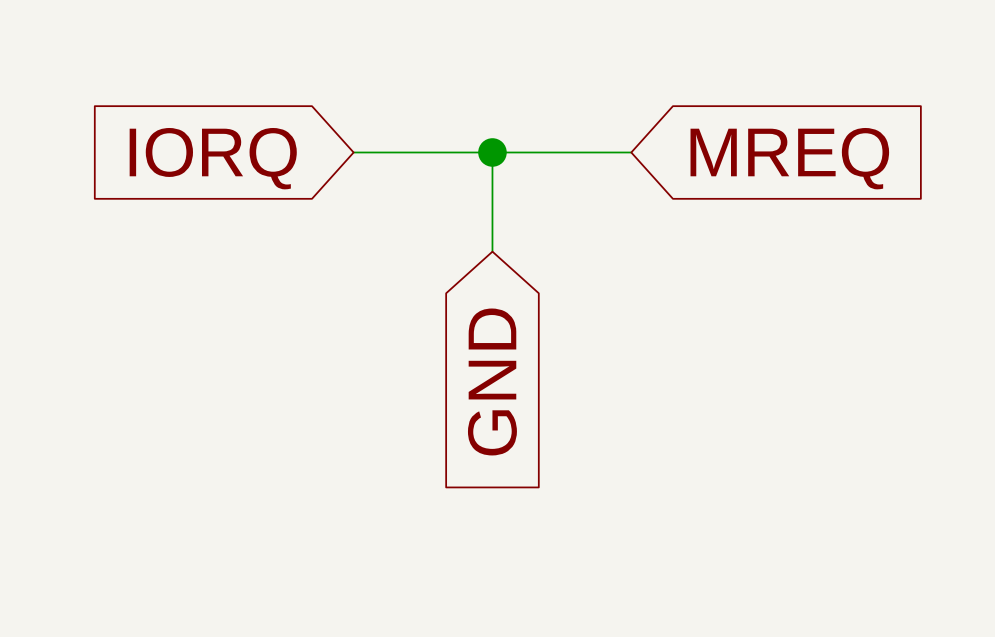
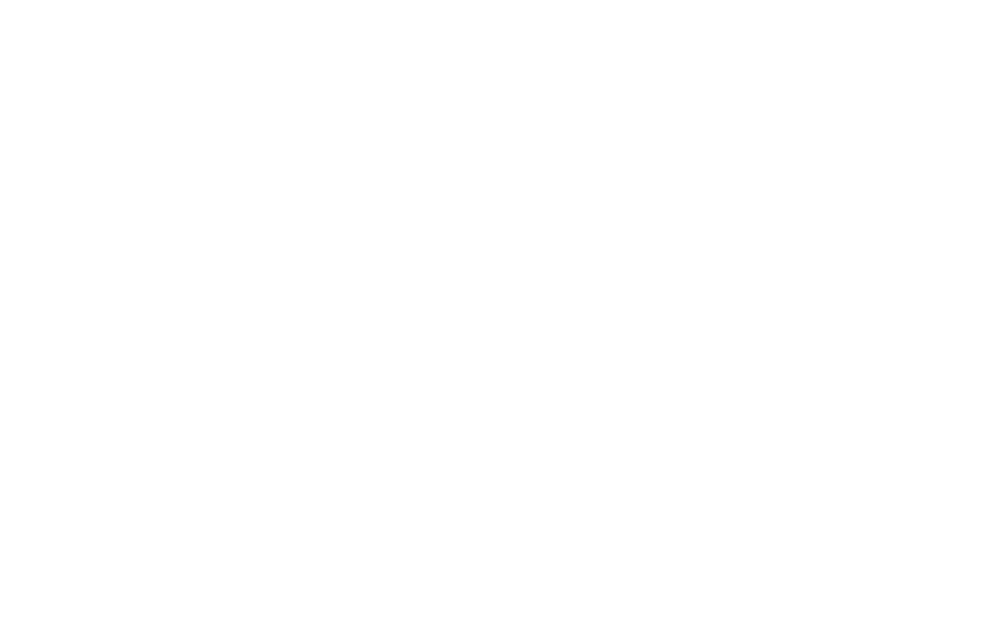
wire: (353, 152) (631, 152) -> none
wire: (492, 152) (492, 251) -> none
junction: (492, 152) -> none
global label: IORQ (213, 158) -> none
global label: MREQ (789, 158) -> none
global label: GND (492, 381) -> none

